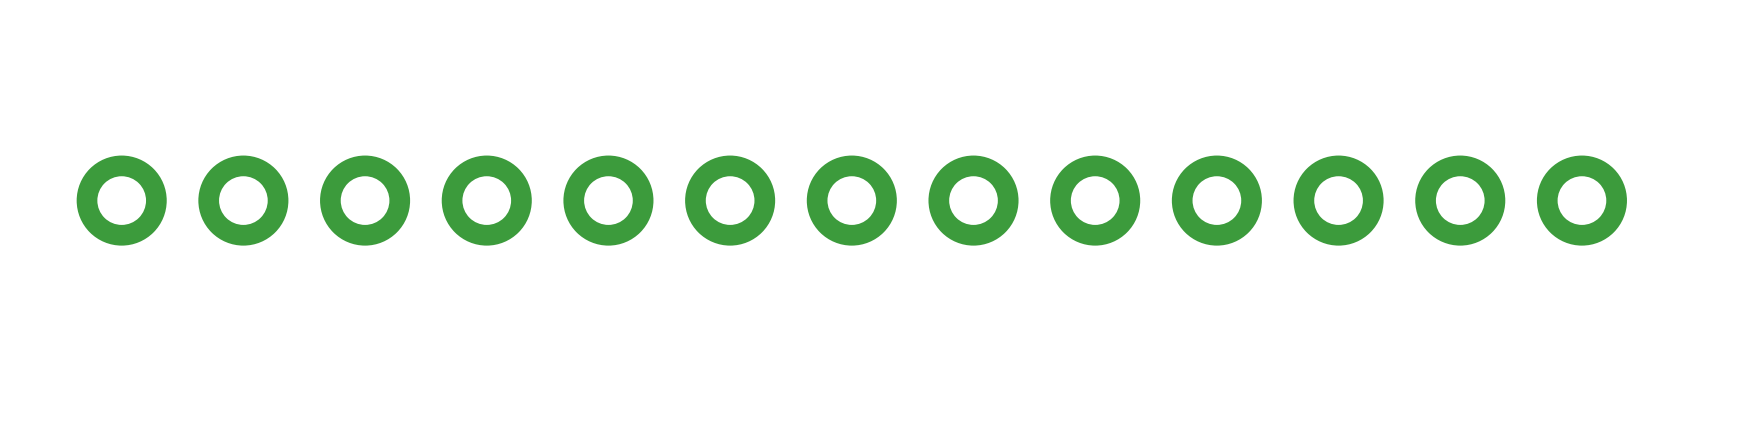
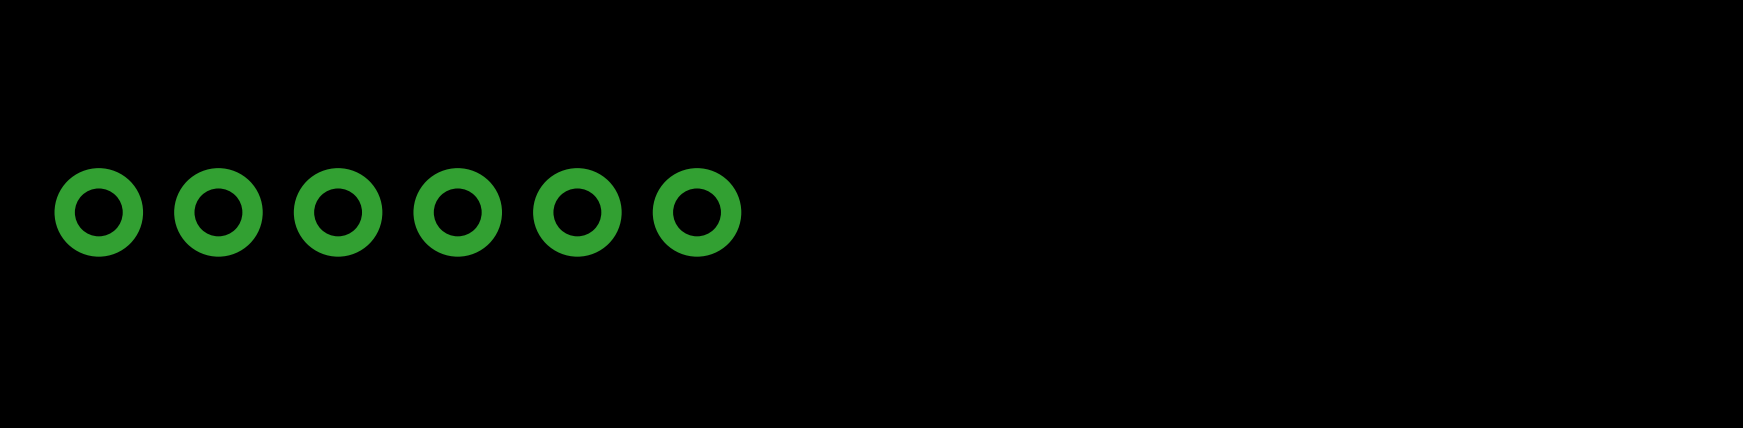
part: (851, 200) -> none
part: (973, 200) -> none
part: (1095, 200) -> none
part: (1216, 200) -> none
part: (1338, 200) -> none
part: (1460, 200) -> none
part: (1581, 200) -> none

